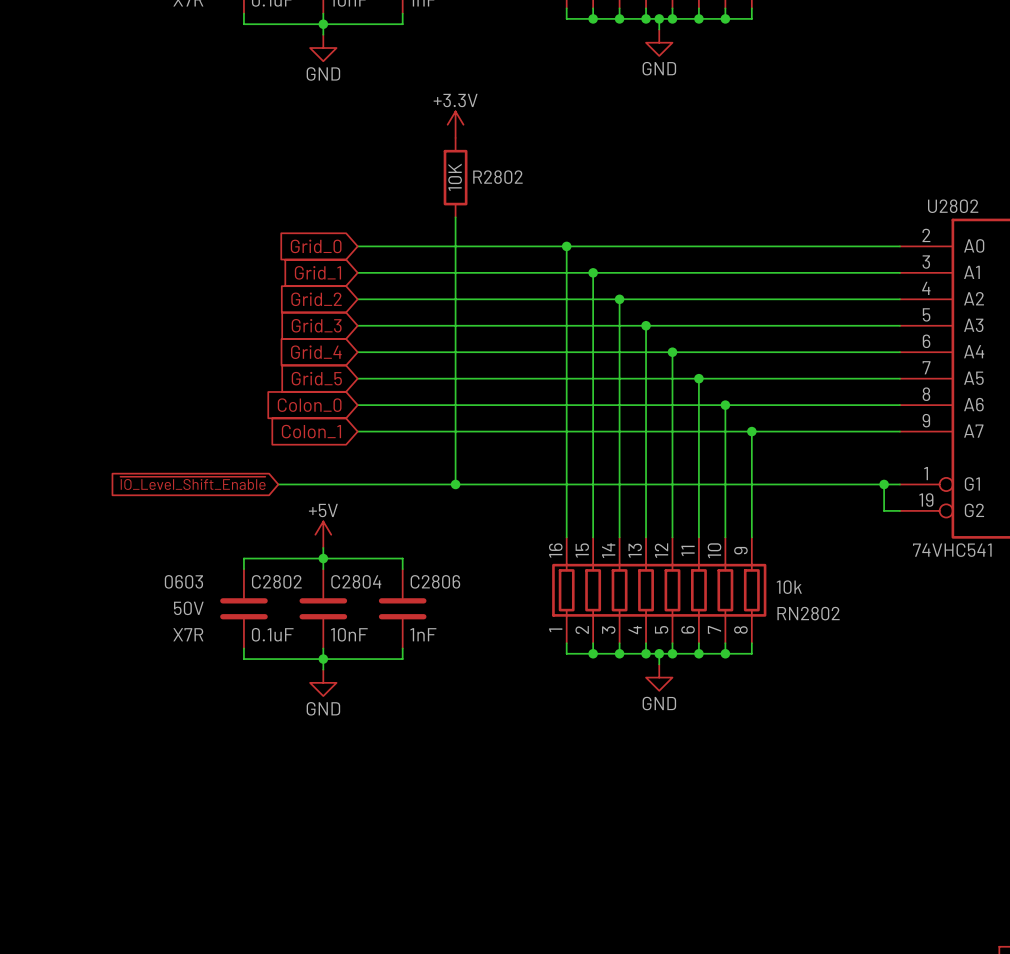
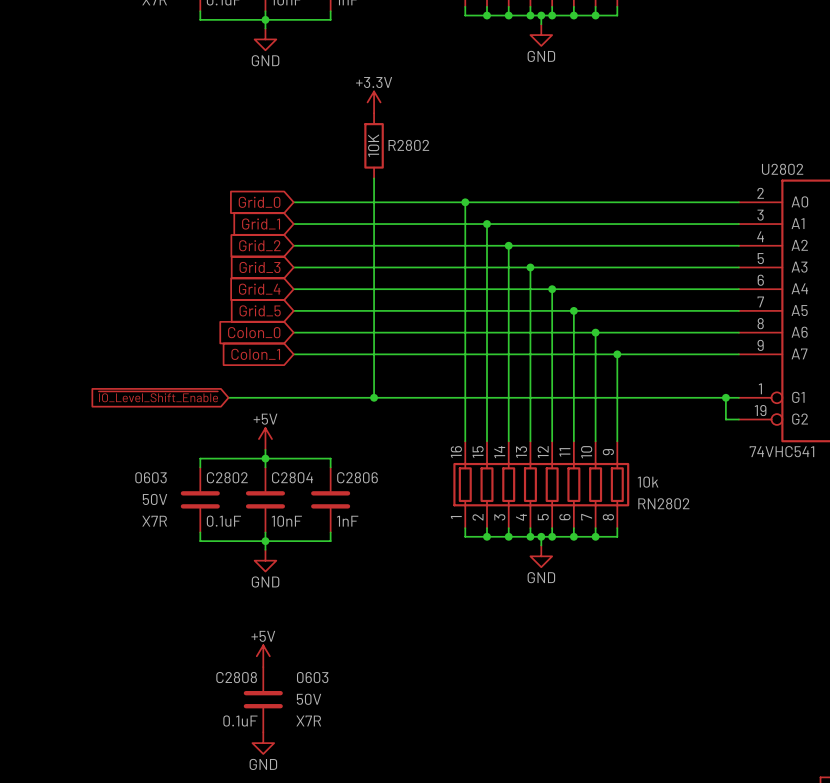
power symbol: none -> +5V (263, 656)
C2808: none -> 0.1uF (263, 699)
power symbol: none -> GND (263, 743)

